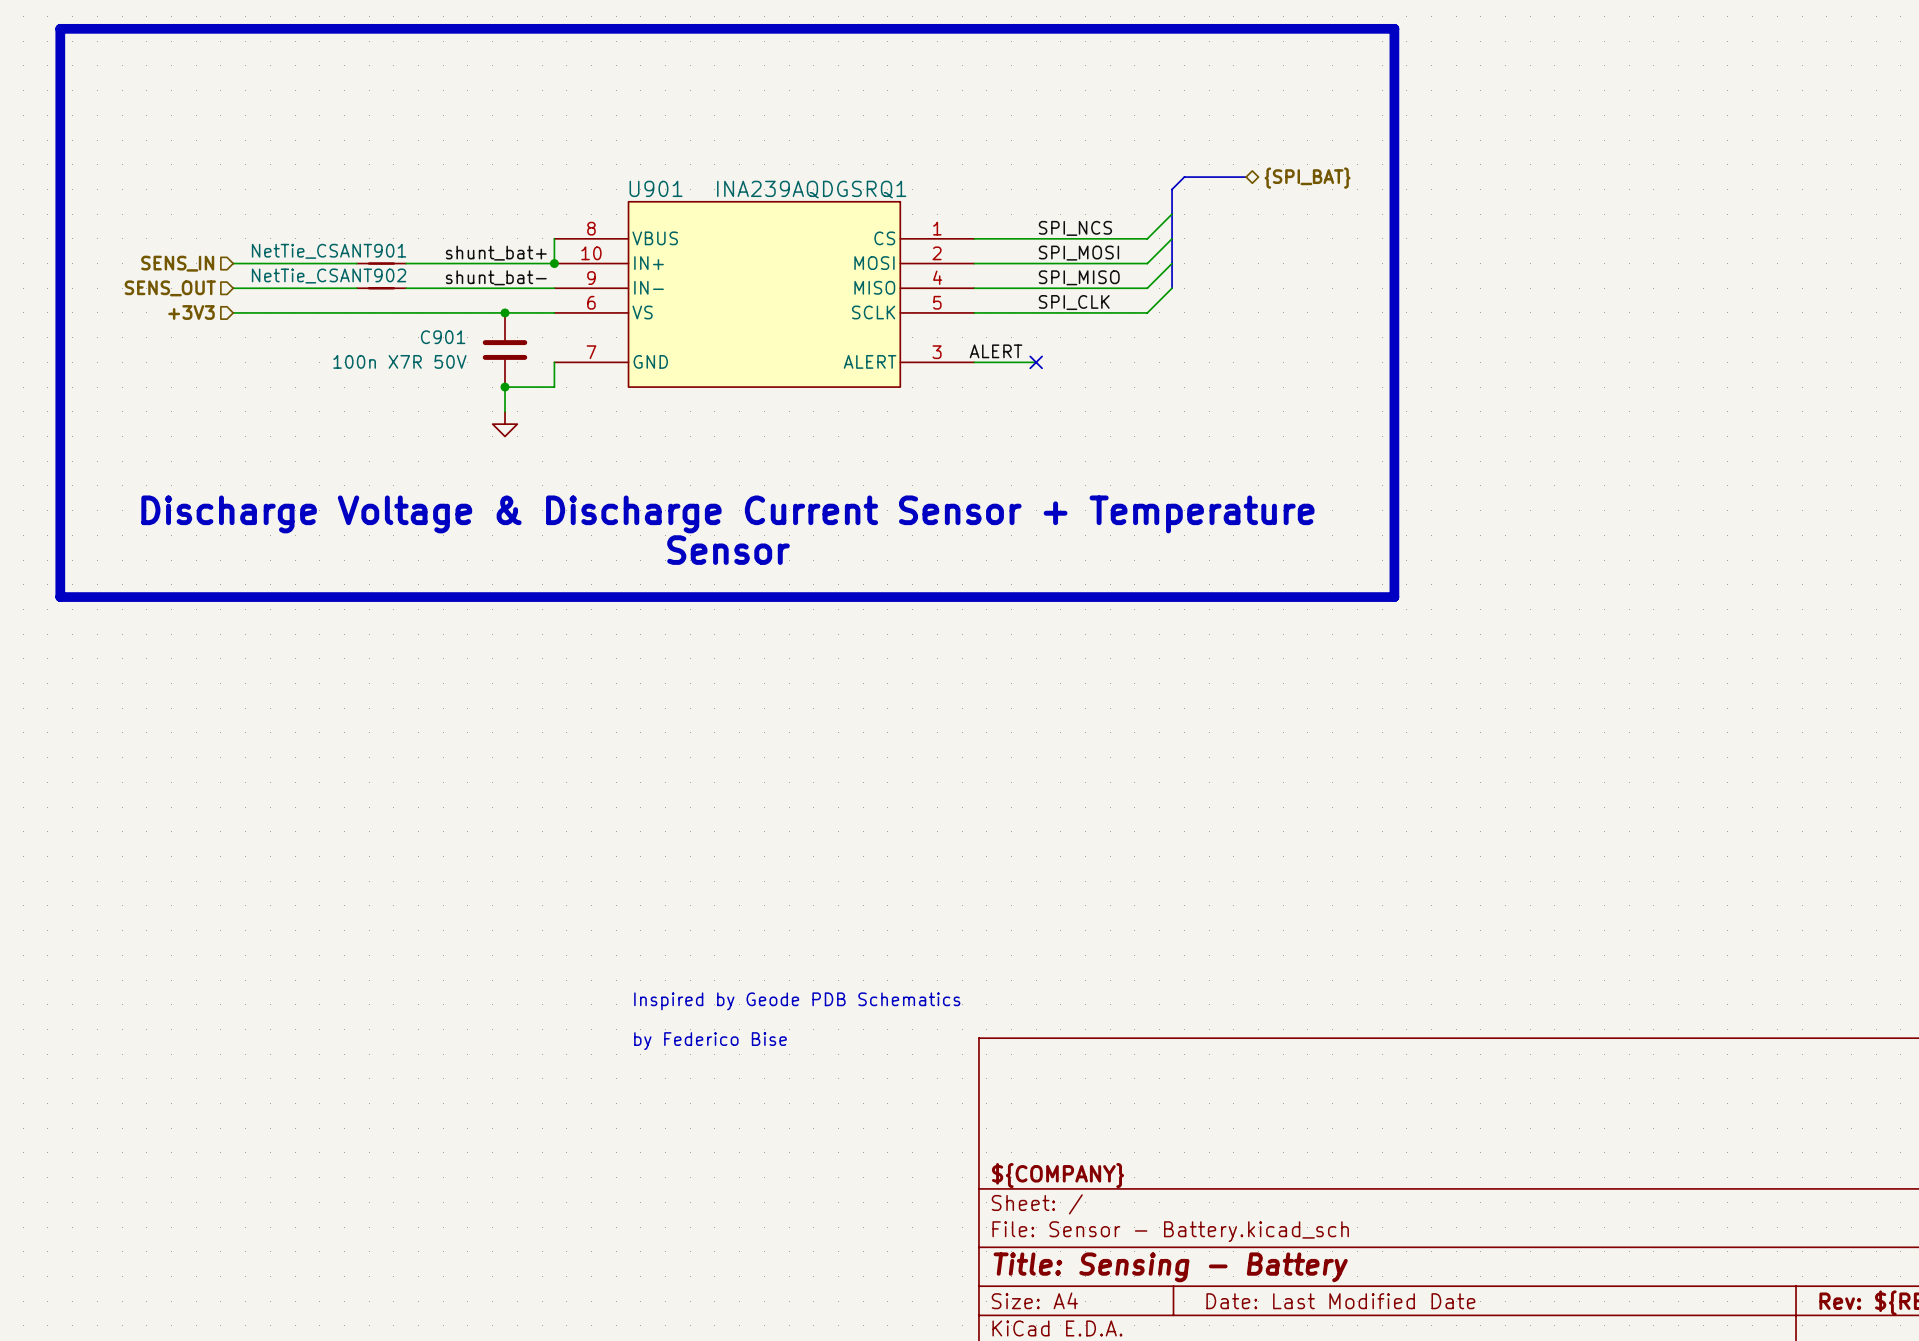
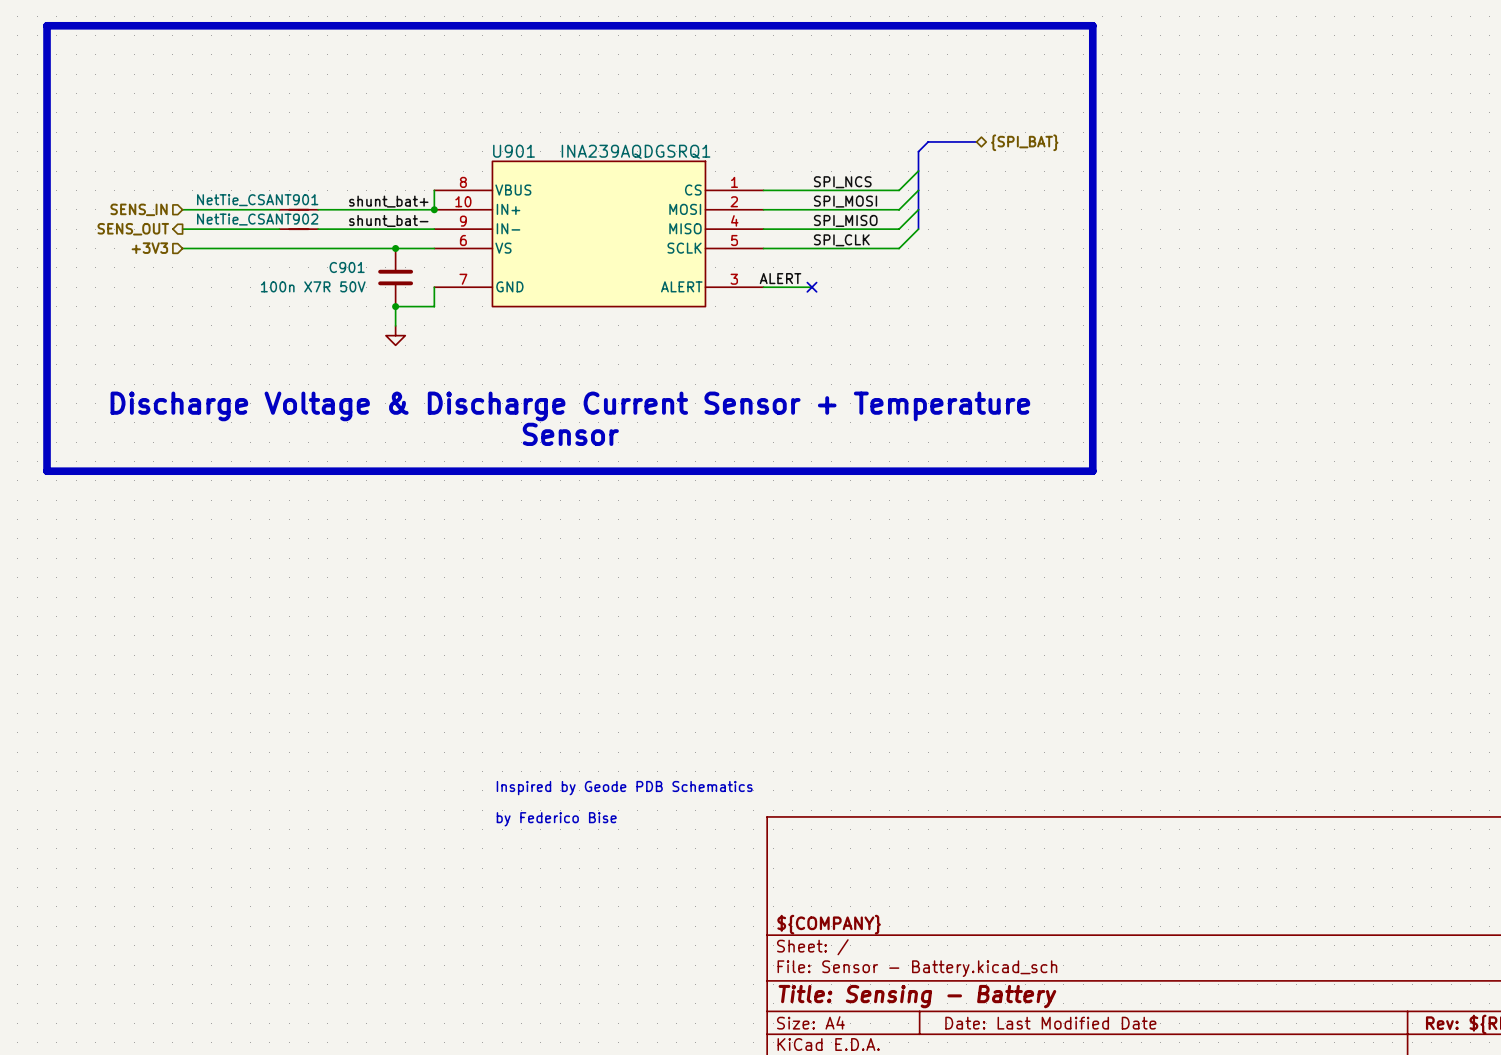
hierarchical label shape: input (170, 288) -> output (133, 229)

